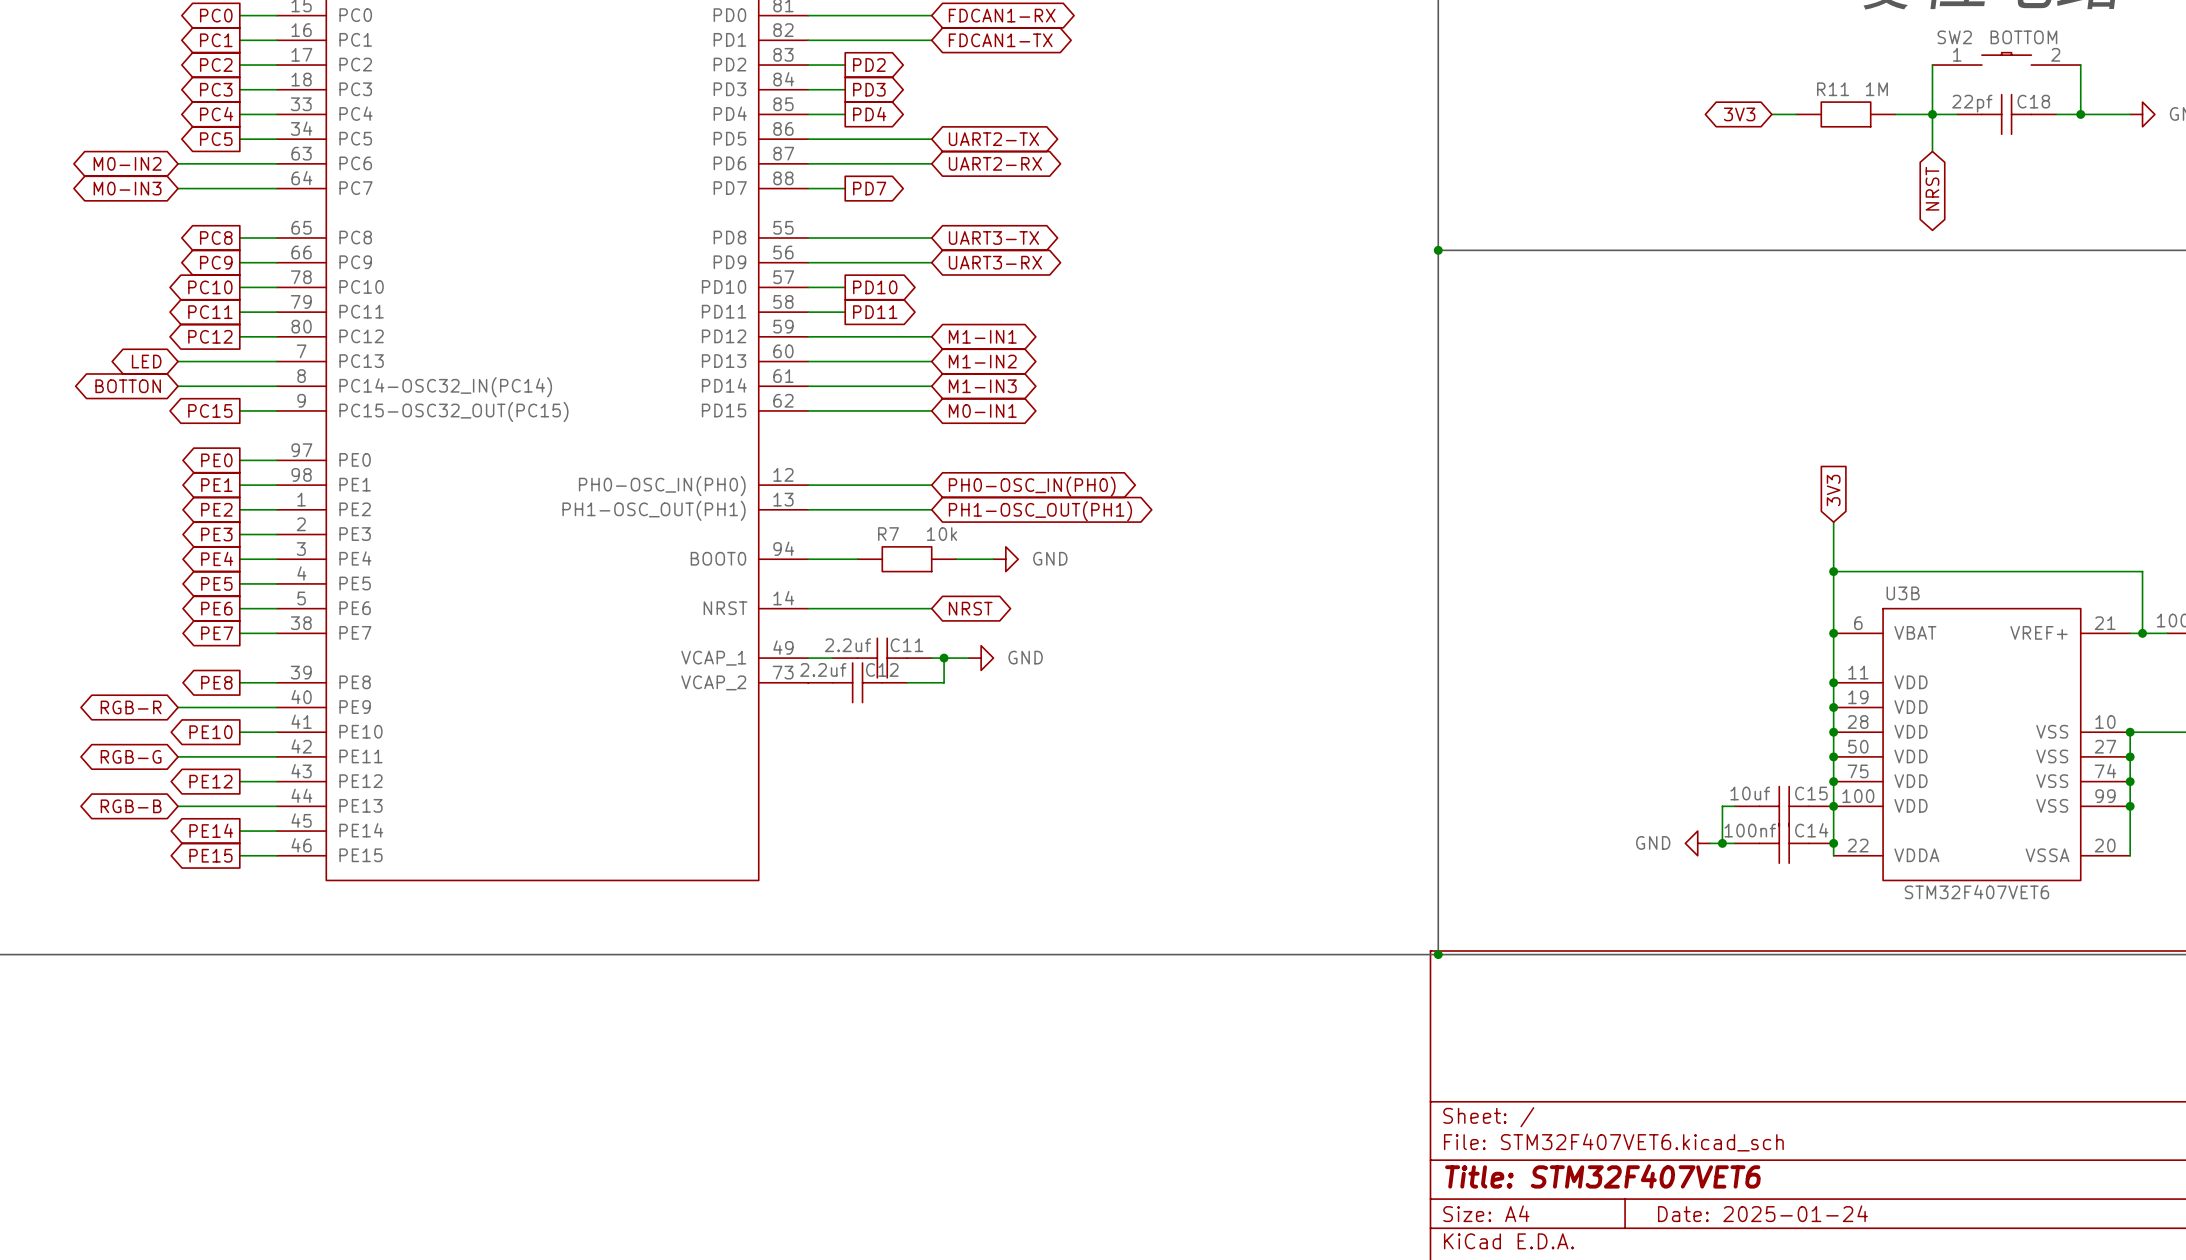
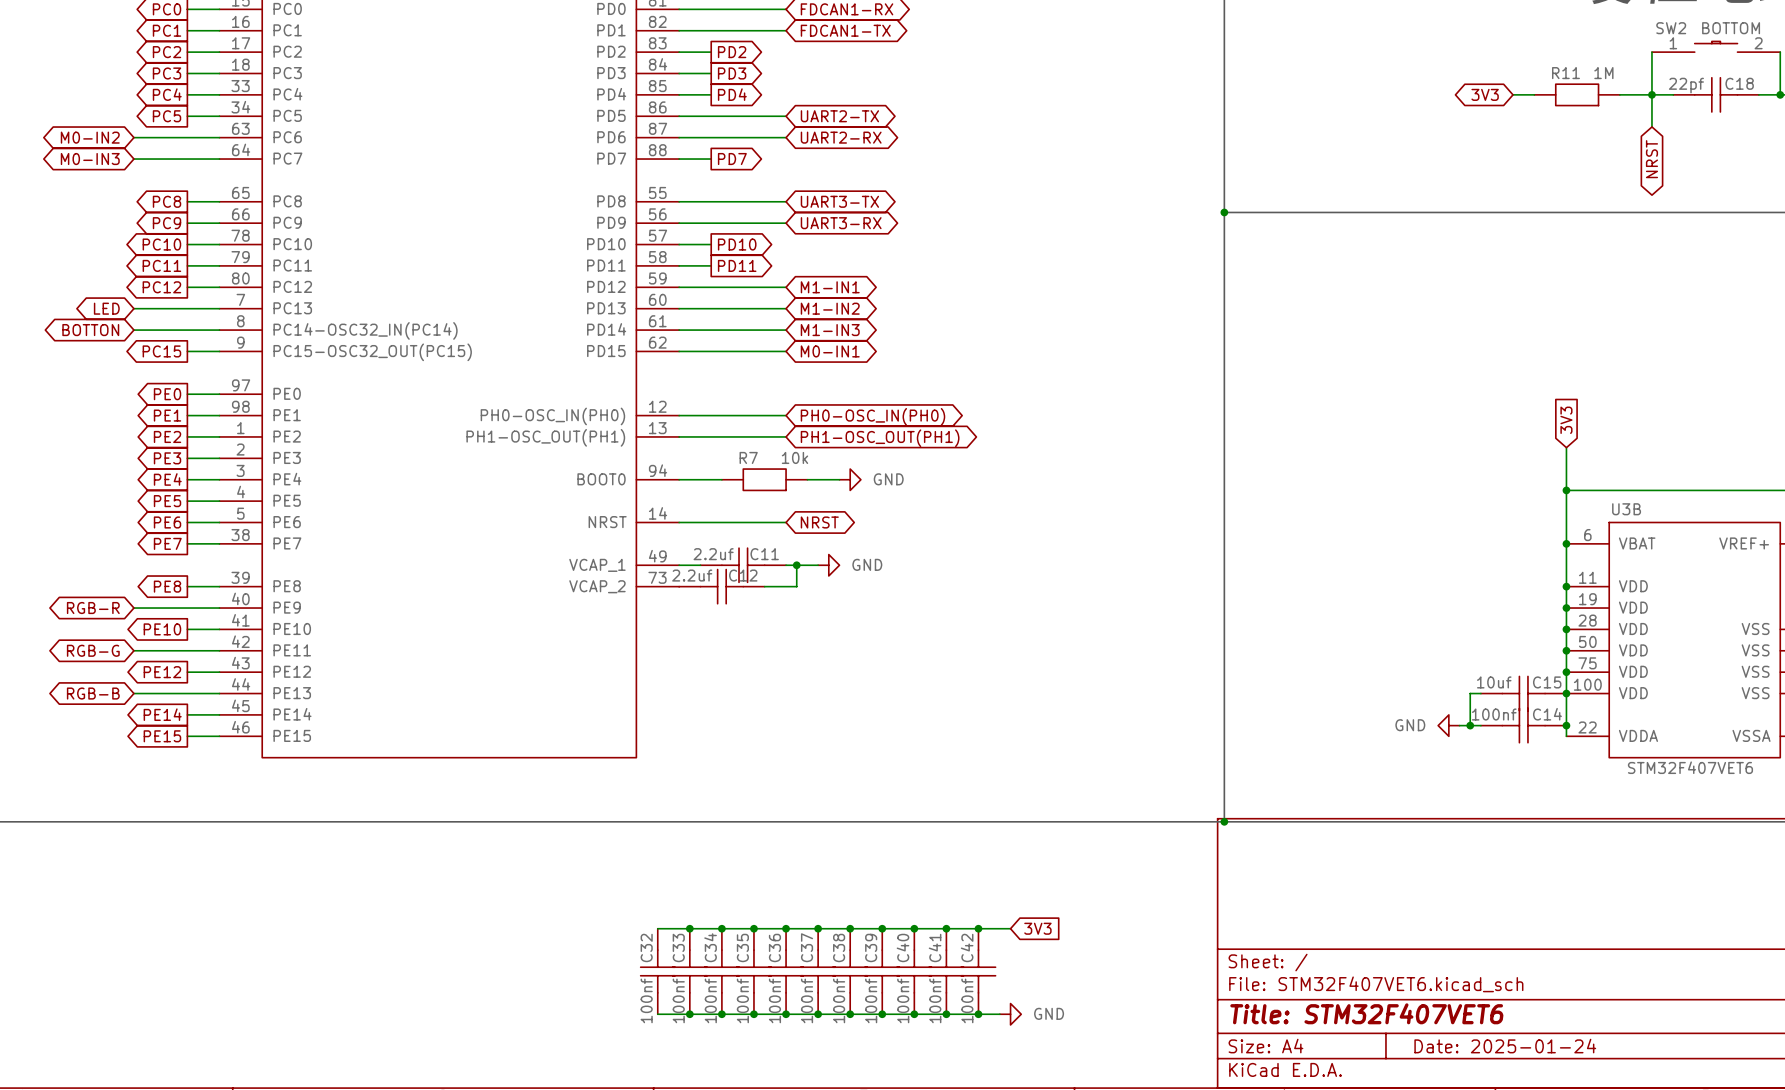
wire: none -> (657, 928) (1010, 928)
junction: none -> (689, 928)
junction: none -> (721, 928)
junction: none -> (753, 928)
junction: none -> (786, 928)
junction: none -> (818, 928)
junction: none -> (850, 928)
junction: none -> (882, 928)
junction: none -> (914, 928)
junction: none -> (946, 928)
junction: none -> (978, 928)
global label: none -> 3V3 (1037, 928)
C32: none -> 100nf (657, 971)
C33: none -> 100nf (689, 971)
C34: none -> 100nf (721, 971)
C35: none -> 100nf (753, 971)
C36: none -> 100nf (786, 971)
C37: none -> 100nf (818, 971)
C38: none -> 100nf (850, 971)
C39: none -> 100nf (882, 971)
C40: none -> 100nf (914, 971)
C41: none -> 100nf (946, 971)
C42: none -> 100nf (978, 971)
wire: none -> (657, 1014) (999, 1014)
junction: none -> (689, 1014)
junction: none -> (721, 1014)
junction: none -> (753, 1014)
junction: none -> (786, 1014)
junction: none -> (818, 1014)
junction: none -> (850, 1014)
junction: none -> (882, 1014)
junction: none -> (914, 1014)
junction: none -> (946, 1014)
junction: none -> (978, 1014)
power symbol: none -> GND (1010, 1014)

